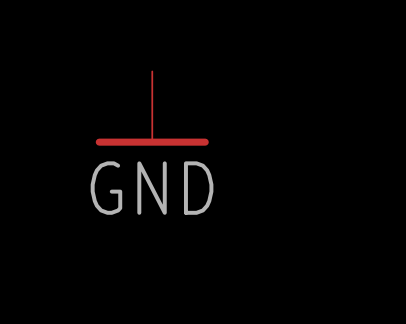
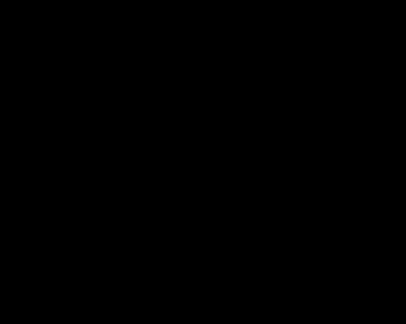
power symbol: GND (152, 108) -> none

